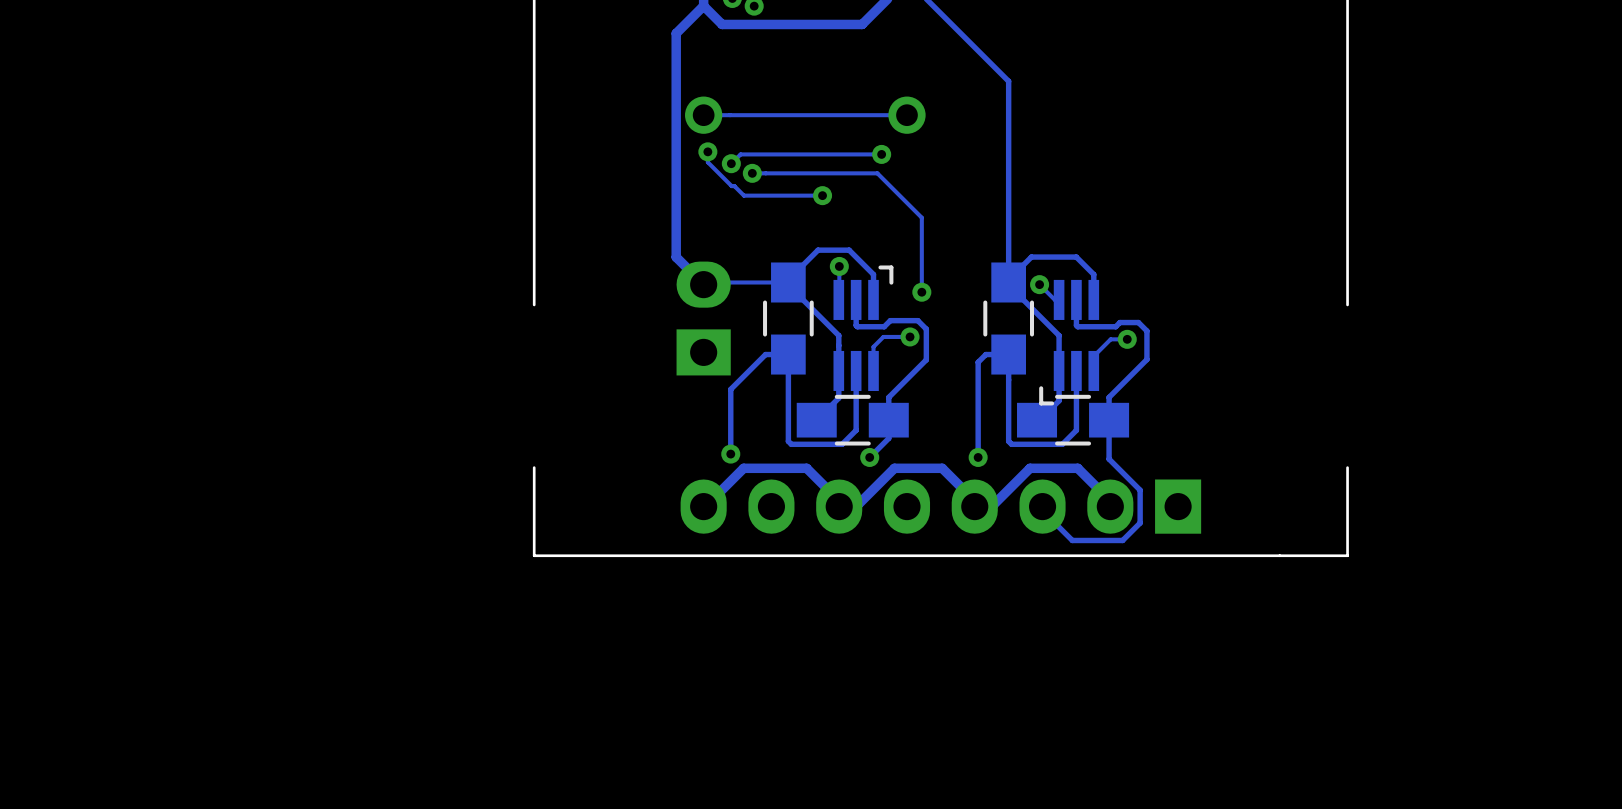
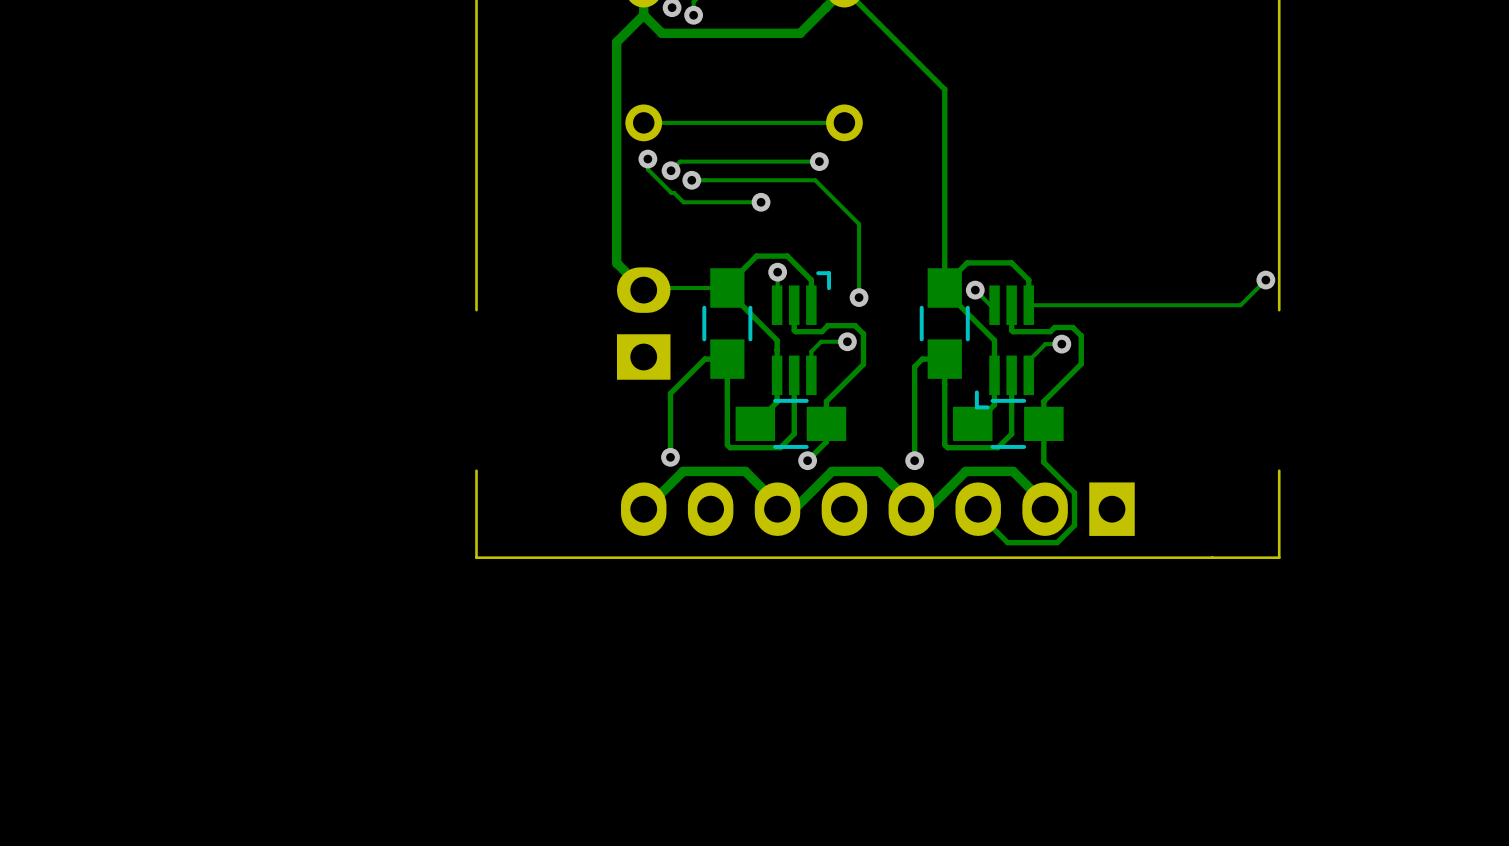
track: none -> (1265, 280) (1240, 305) (1028, 305)
via: none -> (1265, 280)

